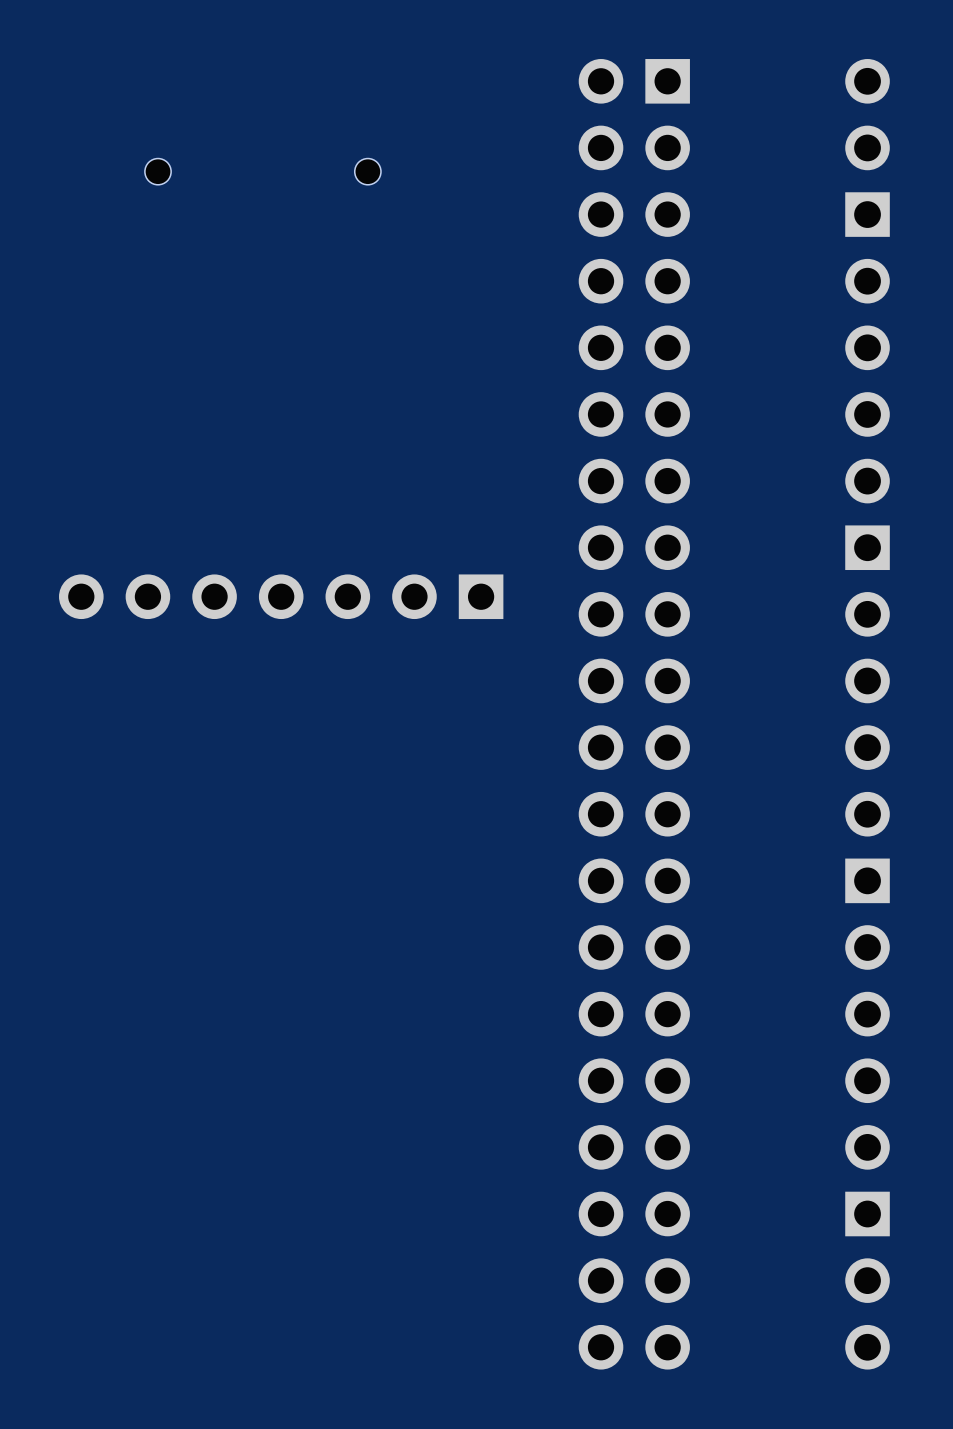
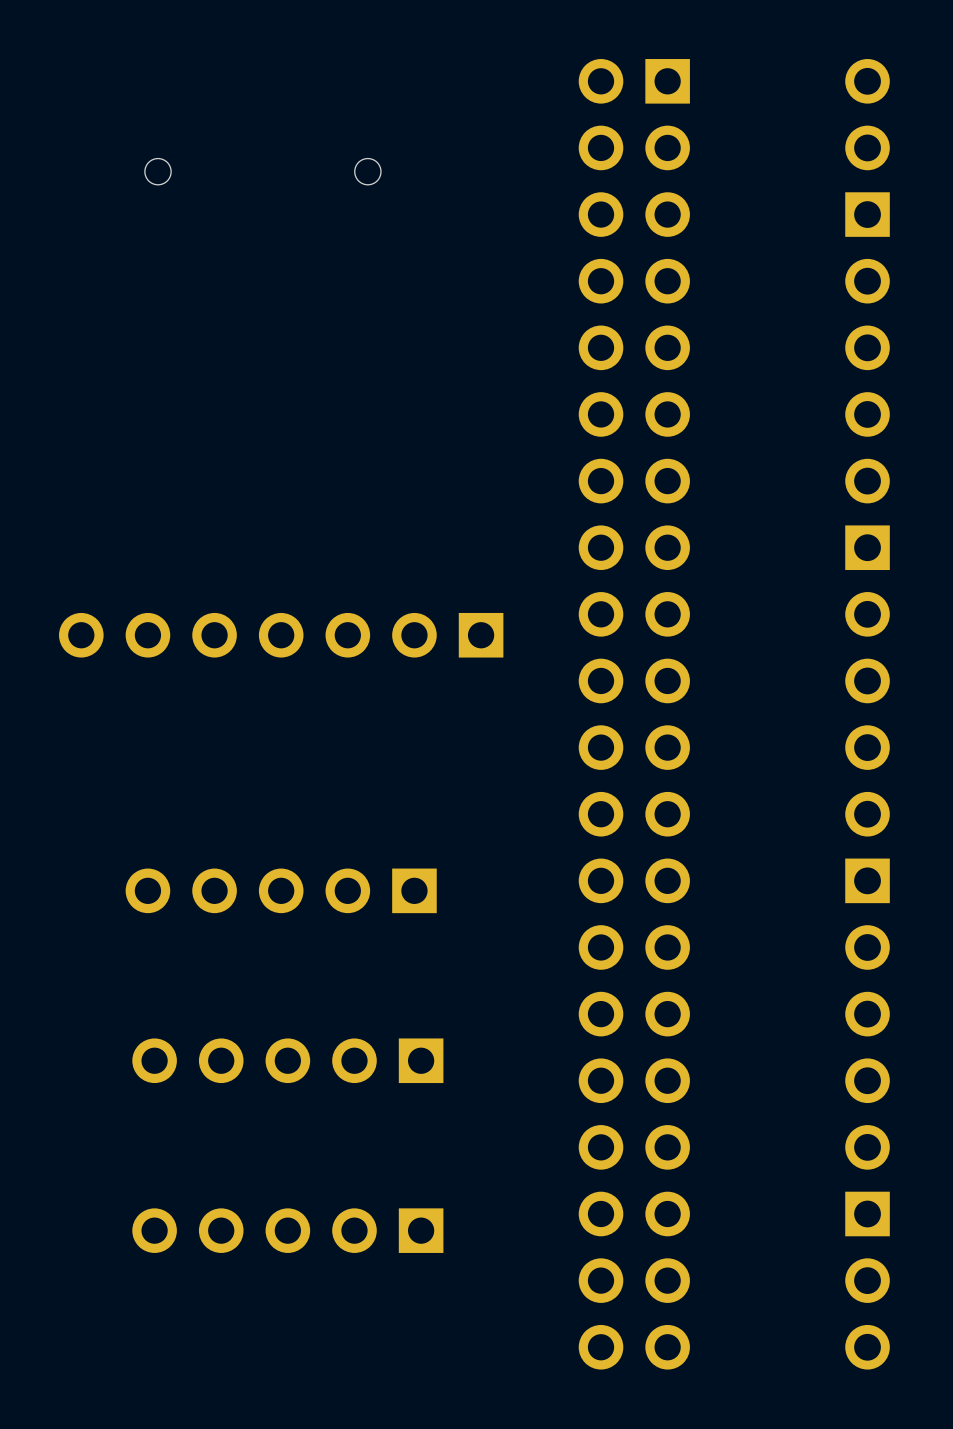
part position: (281, 596) -> (281, 635)
part: none -> (281, 890)
part: none -> (287, 1060)
part: none -> (287, 1230)

